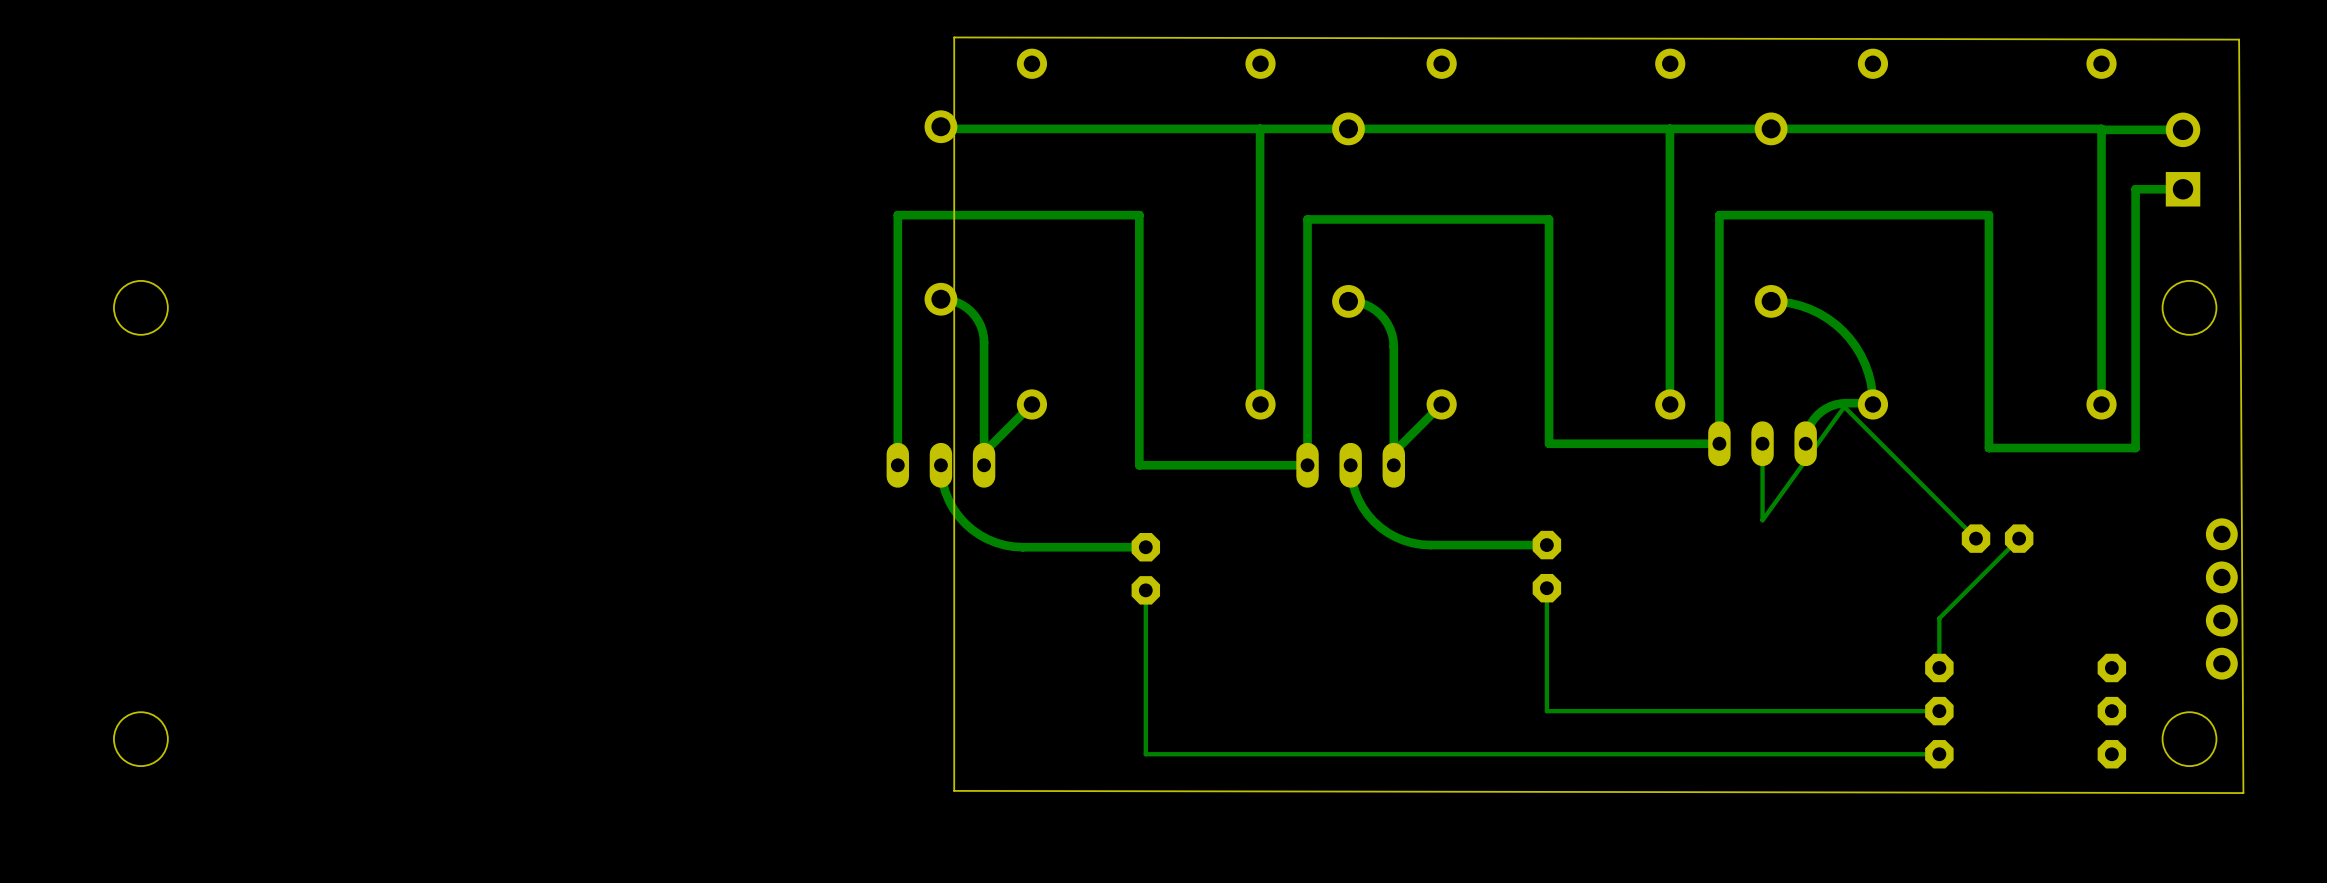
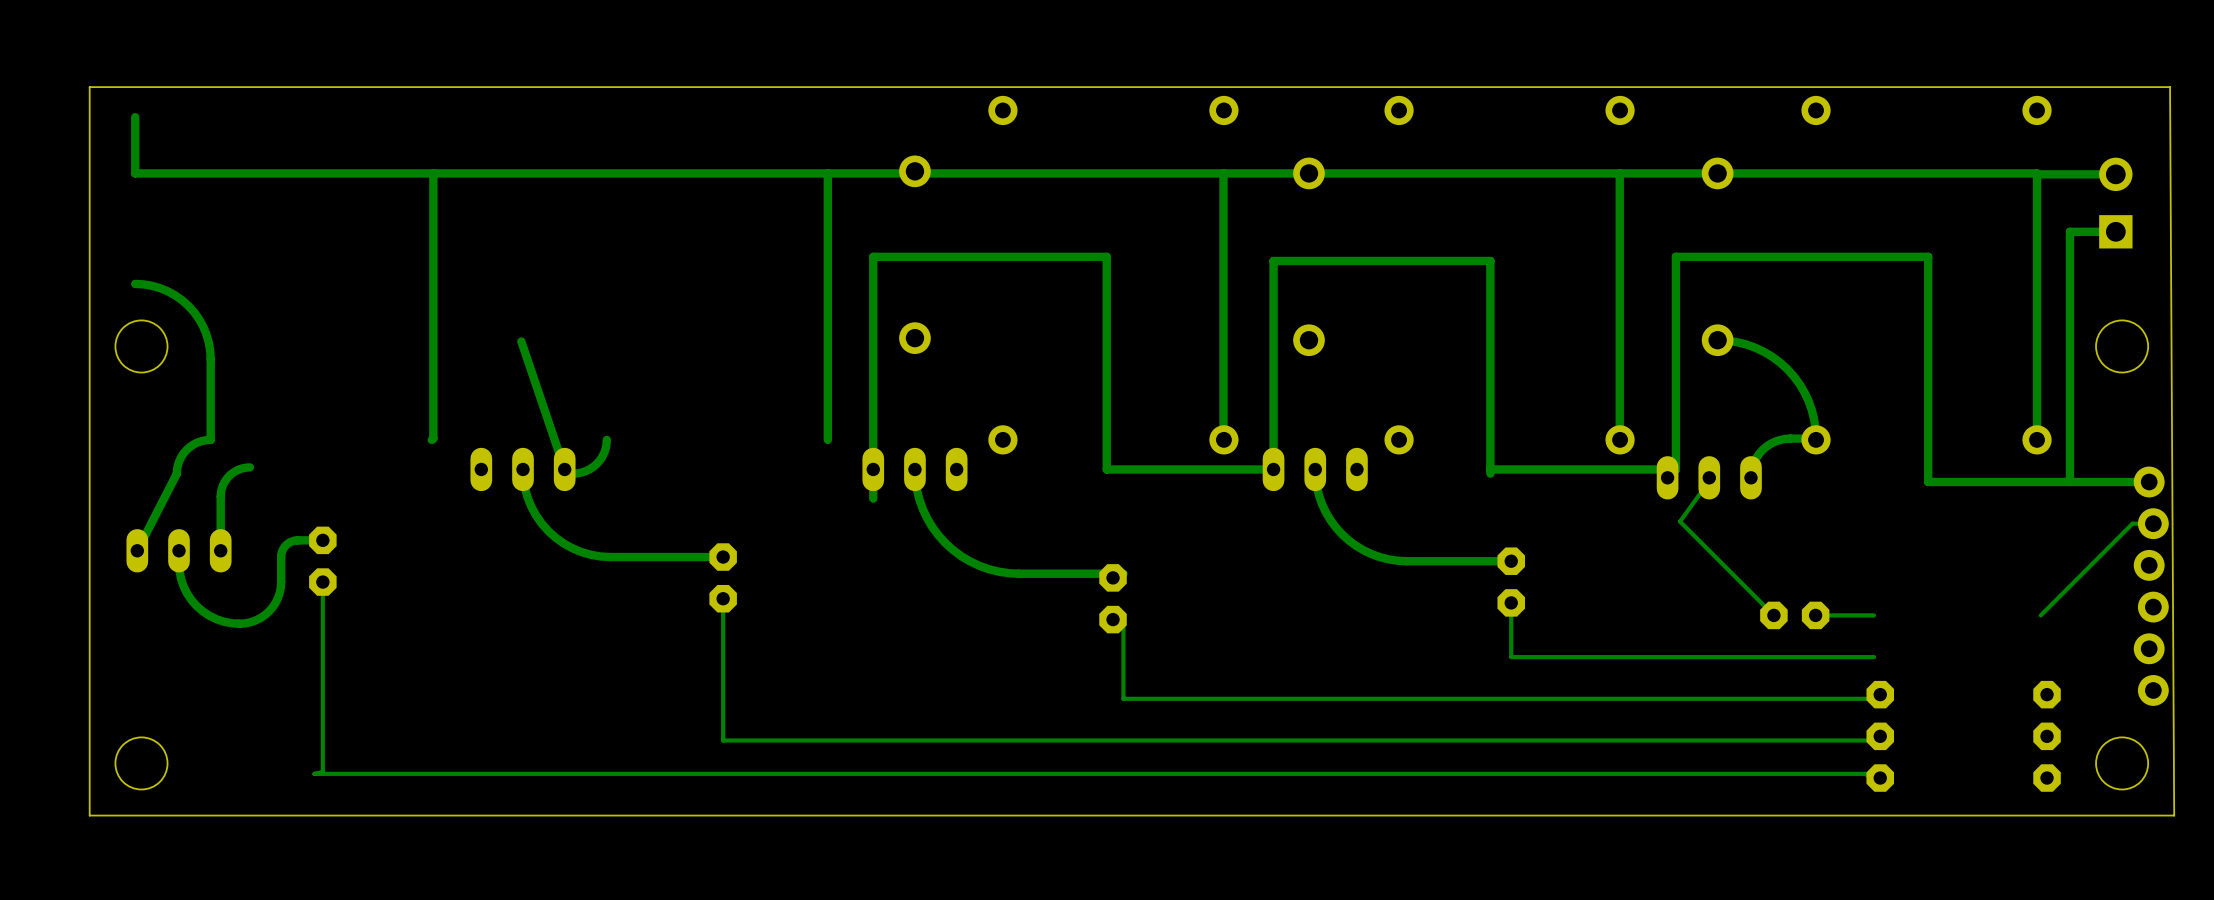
board edge: (2239, 39) (954, 37) (954, 790) (2243, 793) -> (2170, 87) (89, 87) (89, 815) (2174, 815)
bottom track: none -> (135, 117) (135, 173) (910, 173)
bottom track: none -> (433, 173) (433, 438) (431, 439)
bottom track: none -> (827, 173) (827, 439)
bottom track: (1728, 215) (1719, 215) (1719, 443) (1549, 443) (1549, 219) (1536, 219) -> (1675, 256) (1675, 469) (1490, 469)
bottom track: (1311, 219) (1307, 219) (1307, 465) (1139, 465) (1139, 435) -> (1273, 260) (1273, 469) (1106, 469)
bottom track: none -> (1490, 260) (1490, 473)
bottom track: none -> (135, 283) (152, 285) (167, 291) (188, 306) (203, 326) (208, 342) (210, 359) (210, 439) (193, 444) (181, 456) (176, 473) (137, 550)
bottom track: (940, 299) (952, 300) (967, 308) (975, 316) (982, 331) (984, 342) (984, 465) (981, 458) (983, 453) (984, 452) (1031, 404) -> none
bottom track: (1348, 301) (1365, 304) (1376, 310) (1387, 324) (1392, 334) (1393, 346) (1393, 465) (1391, 458) (1393, 453) (1393, 452) (1441, 404) -> none
bottom track: none -> (521, 341) (564, 469)
bottom track: none -> (606, 439) (604, 452) (596, 463) (585, 471) (573, 473)
bottom track: none -> (249, 467) (232, 473) (222, 485) (220, 496) (220, 550)
bottom track: none -> (523, 469) (527, 498) (536, 516) (548, 531) (572, 548) (600, 556) (723, 557)
part: none -> (523, 469)
bottom track: none -> (914, 469) (916, 489) (927, 518) (945, 543) (970, 561) (988, 569) (1008, 573) (1123, 573)
bottom track: none -> (1315, 469) (1319, 496) (1330, 520) (1348, 540) (1371, 554) (1397, 560) (1511, 561)
bottom track: none -> (1717, 469) (1680, 521) (1773, 615)
bottom track: (1762, 443) (1762, 520) (1844, 406) (1976, 538) -> none
bottom track: none -> (2069, 481) (2149, 481)
bottom track: (940, 465) (945, 492) (953, 508) (971, 529) (995, 542) (1022, 547) (1145, 547) -> none
part position: (940, 465) -> (914, 469)
bottom track: (1350, 465) (1355, 491) (1368, 515) (1388, 532) (1404, 540) (1430, 545) (1546, 545) -> none
part position: (1350, 465) -> (1315, 469)
bottom track: none -> (2153, 523) (2132, 523) (2040, 615)
bottom track: none -> (322, 540) (295, 540) (286, 545) (281, 554) (280, 587) (275, 602) (260, 618) (244, 623) (231, 623) (216, 619) (196, 606) (187, 593) (181, 578) (179, 550)
part: none -> (179, 550)
part: none -> (322, 561)
part: (1997, 538) -> none
bottom track: (2019, 538) (1939, 618) (1939, 667) -> none
part: none -> (723, 577)
bottom track: none -> (322, 582) (322, 772) (314, 773) (1865, 773) (1873, 782)
part: none -> (2151, 586)
part position: (1546, 566) -> (1511, 582)
bottom track: none -> (723, 598) (723, 740) (1873, 740)
bottom track: none -> (1511, 602) (1511, 657) (1873, 657)
bottom track: none -> (1123, 615) (1123, 698) (1873, 698)
part: none -> (1794, 615)
bottom track: none -> (1815, 615) (1873, 615)
bottom track: (1546, 588) (1546, 711) (1939, 711) -> none
bottom track: (1145, 590) (1145, 754) (1939, 754) -> none
part: (2221, 598) -> none

